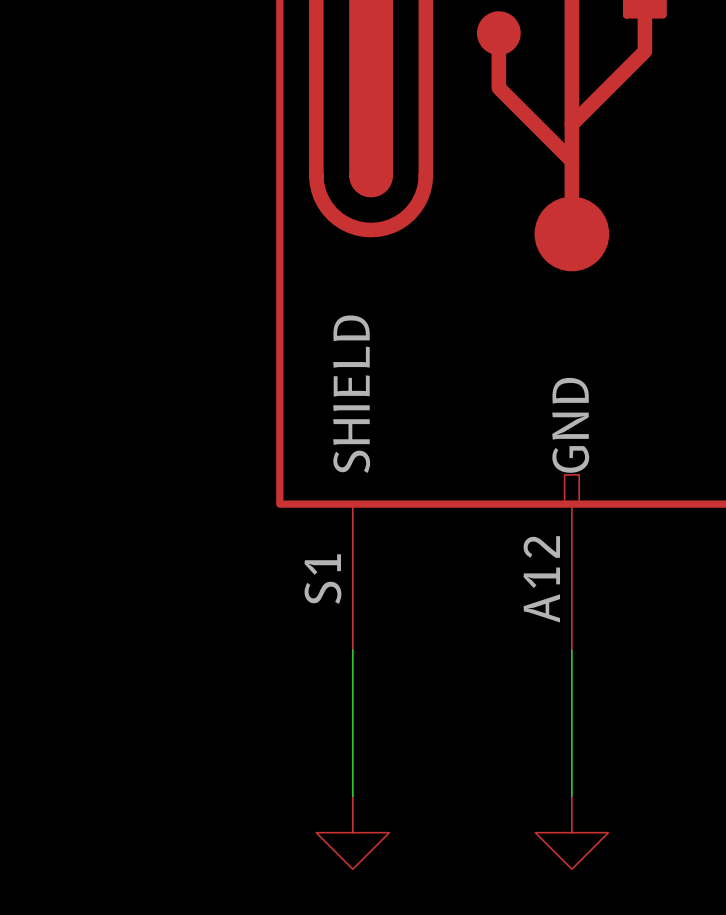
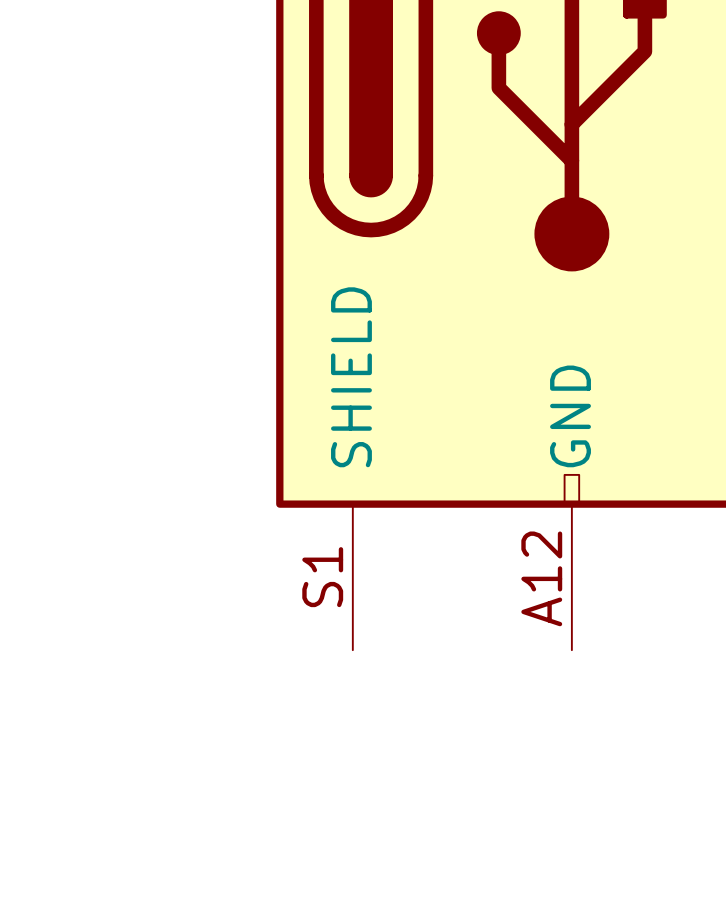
wire: (352, 650) (352, 796) -> none
wire: (571, 650) (571, 796) -> none
power symbol: (352, 832) -> none
power symbol: (571, 832) -> none

